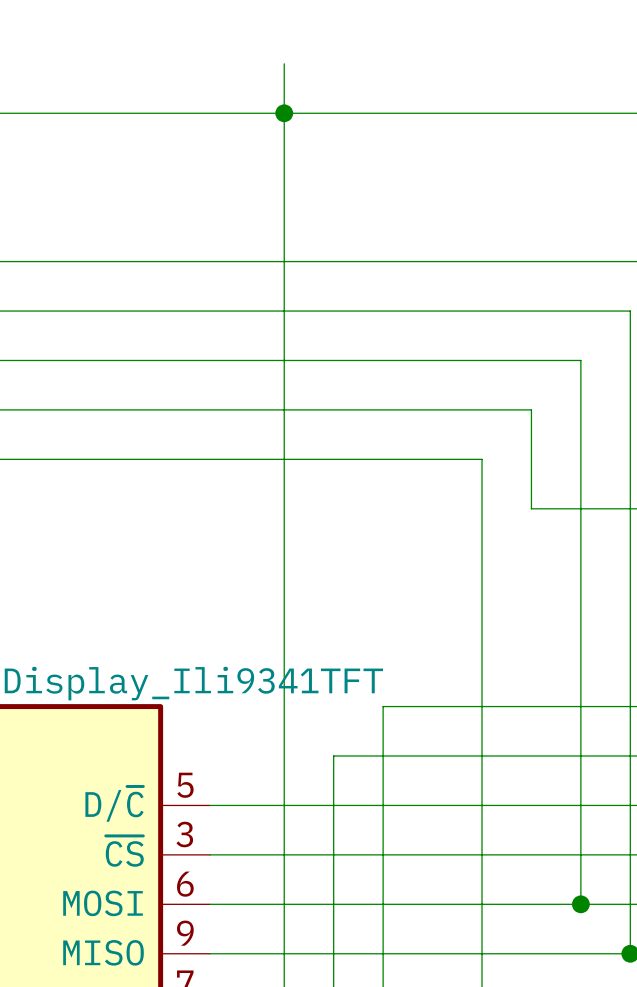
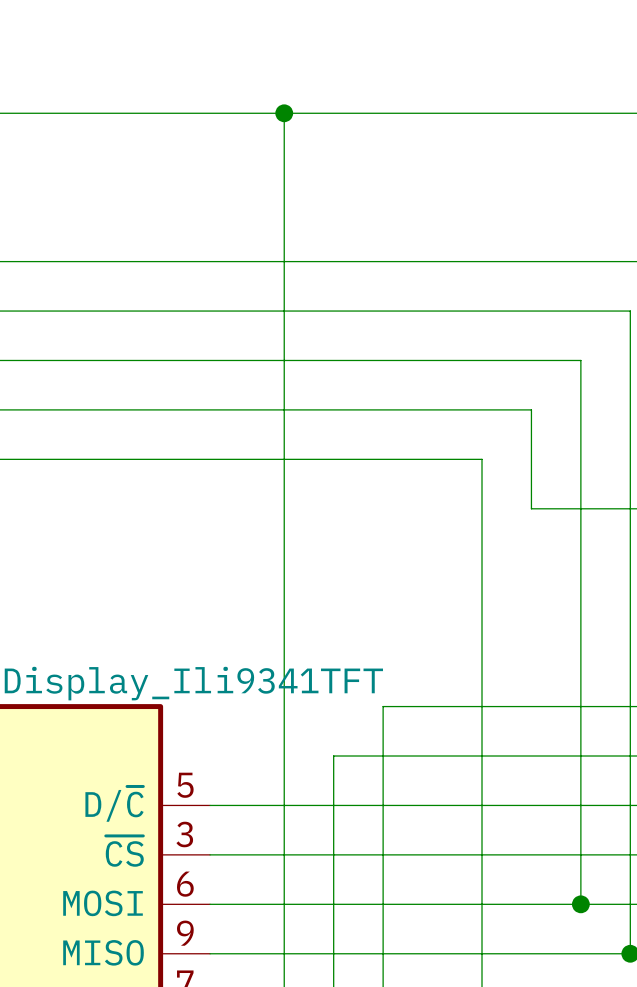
wire: (284, 63) (284, 113) -> none

